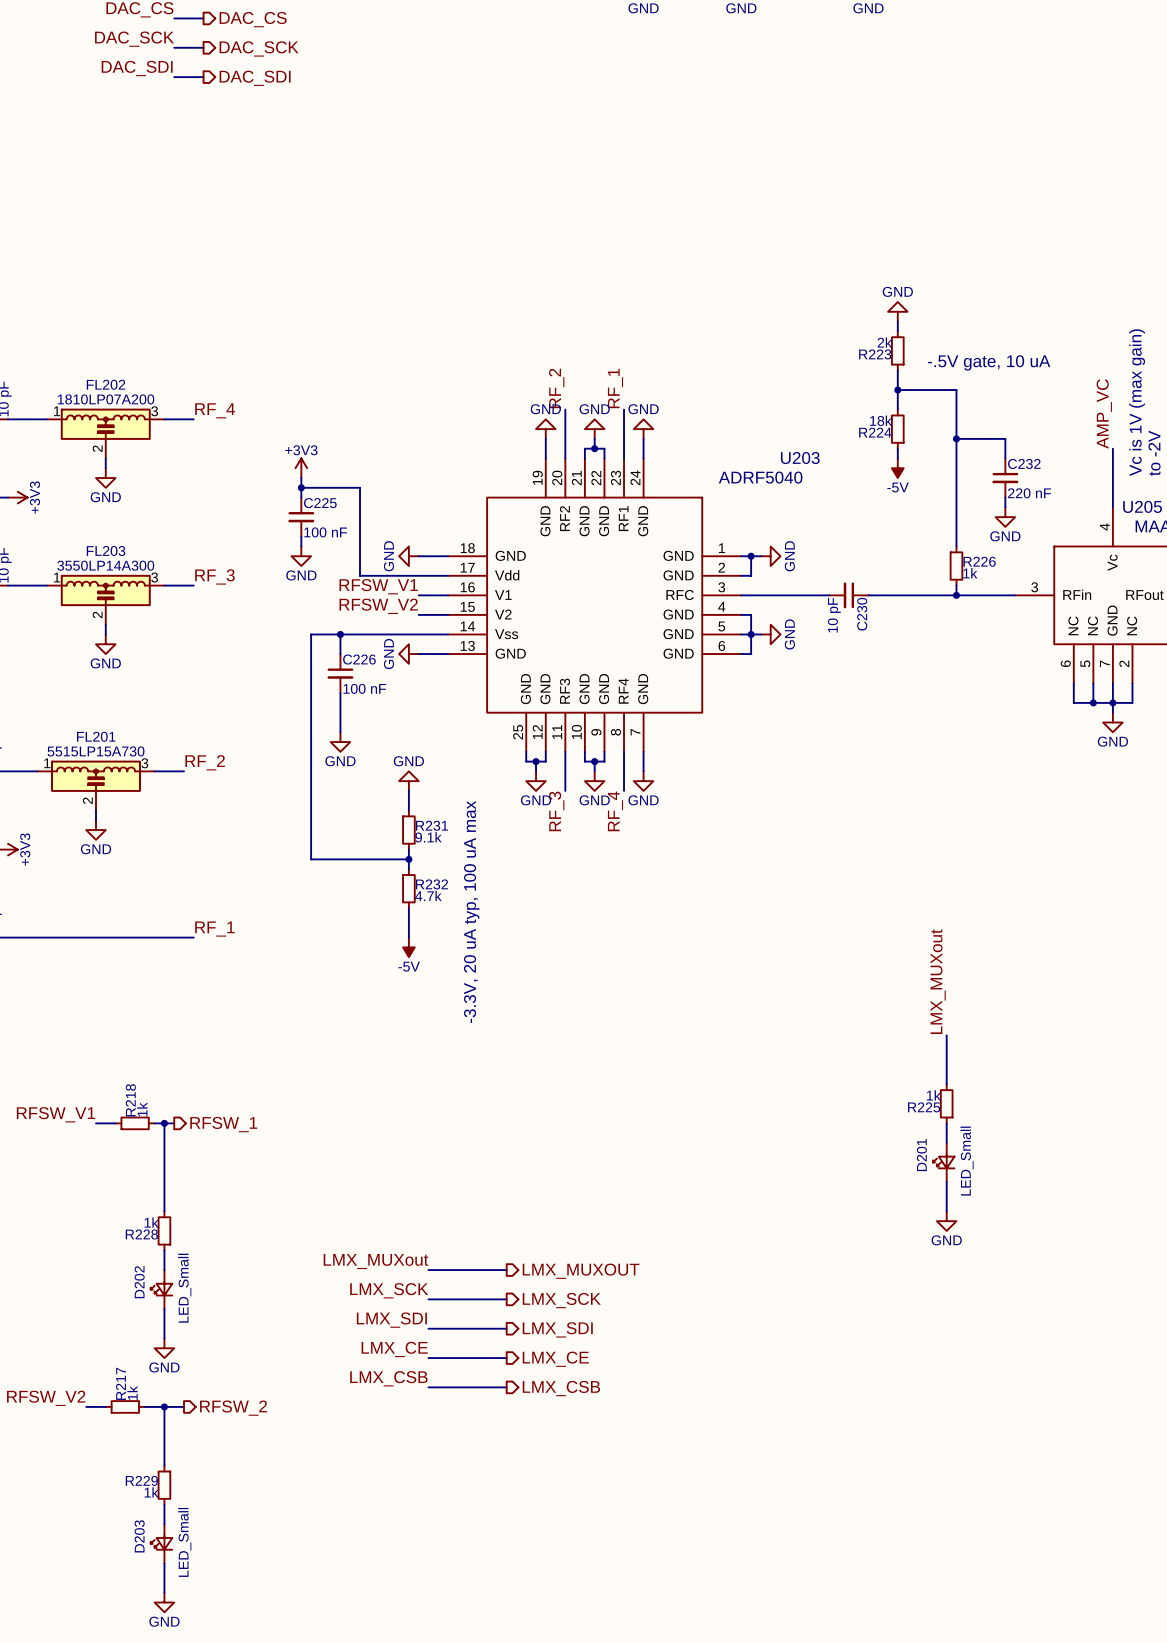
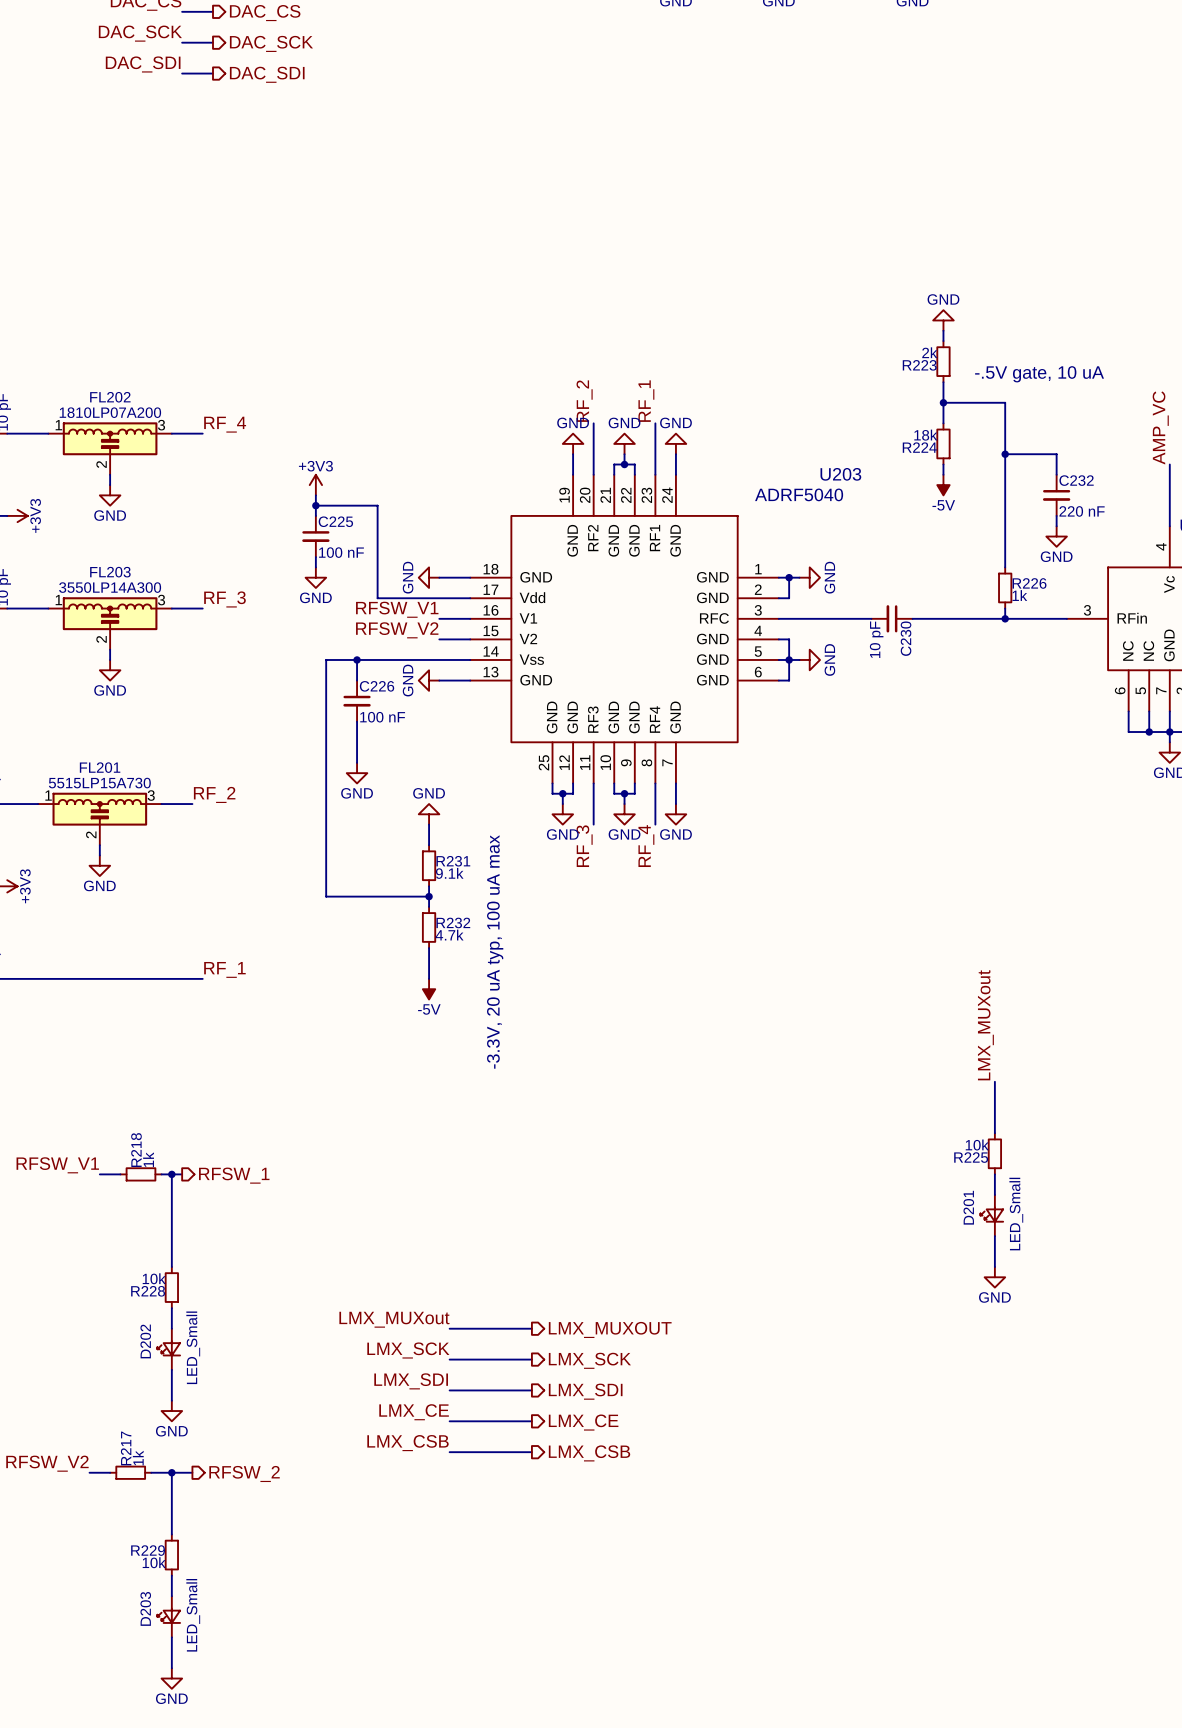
R225 value: 1k (933, 1095) -> 10k (977, 1145)
R228 value: 1k (151, 1222) -> 10k (154, 1278)
R229 value: 1k (151, 1492) -> 10k (154, 1562)

